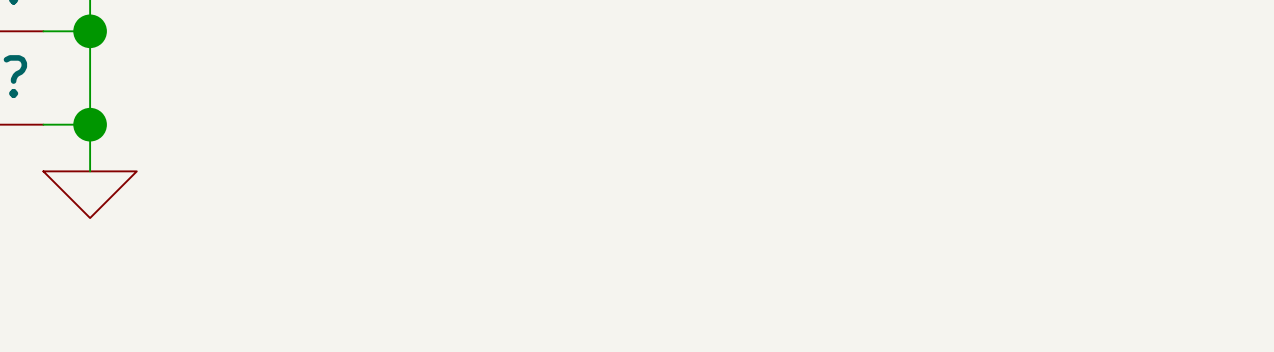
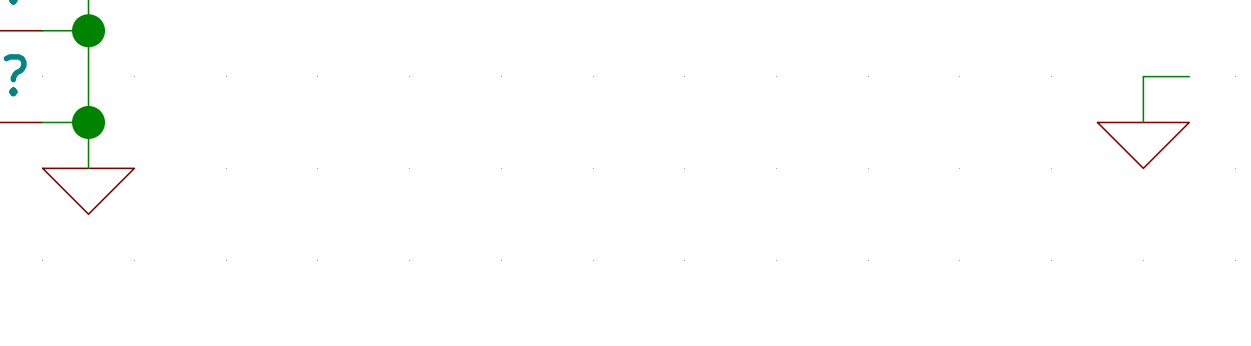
wire: none -> (1189, 76) (1143, 76) (1143, 122)
power symbol: none -> (1143, 145)

